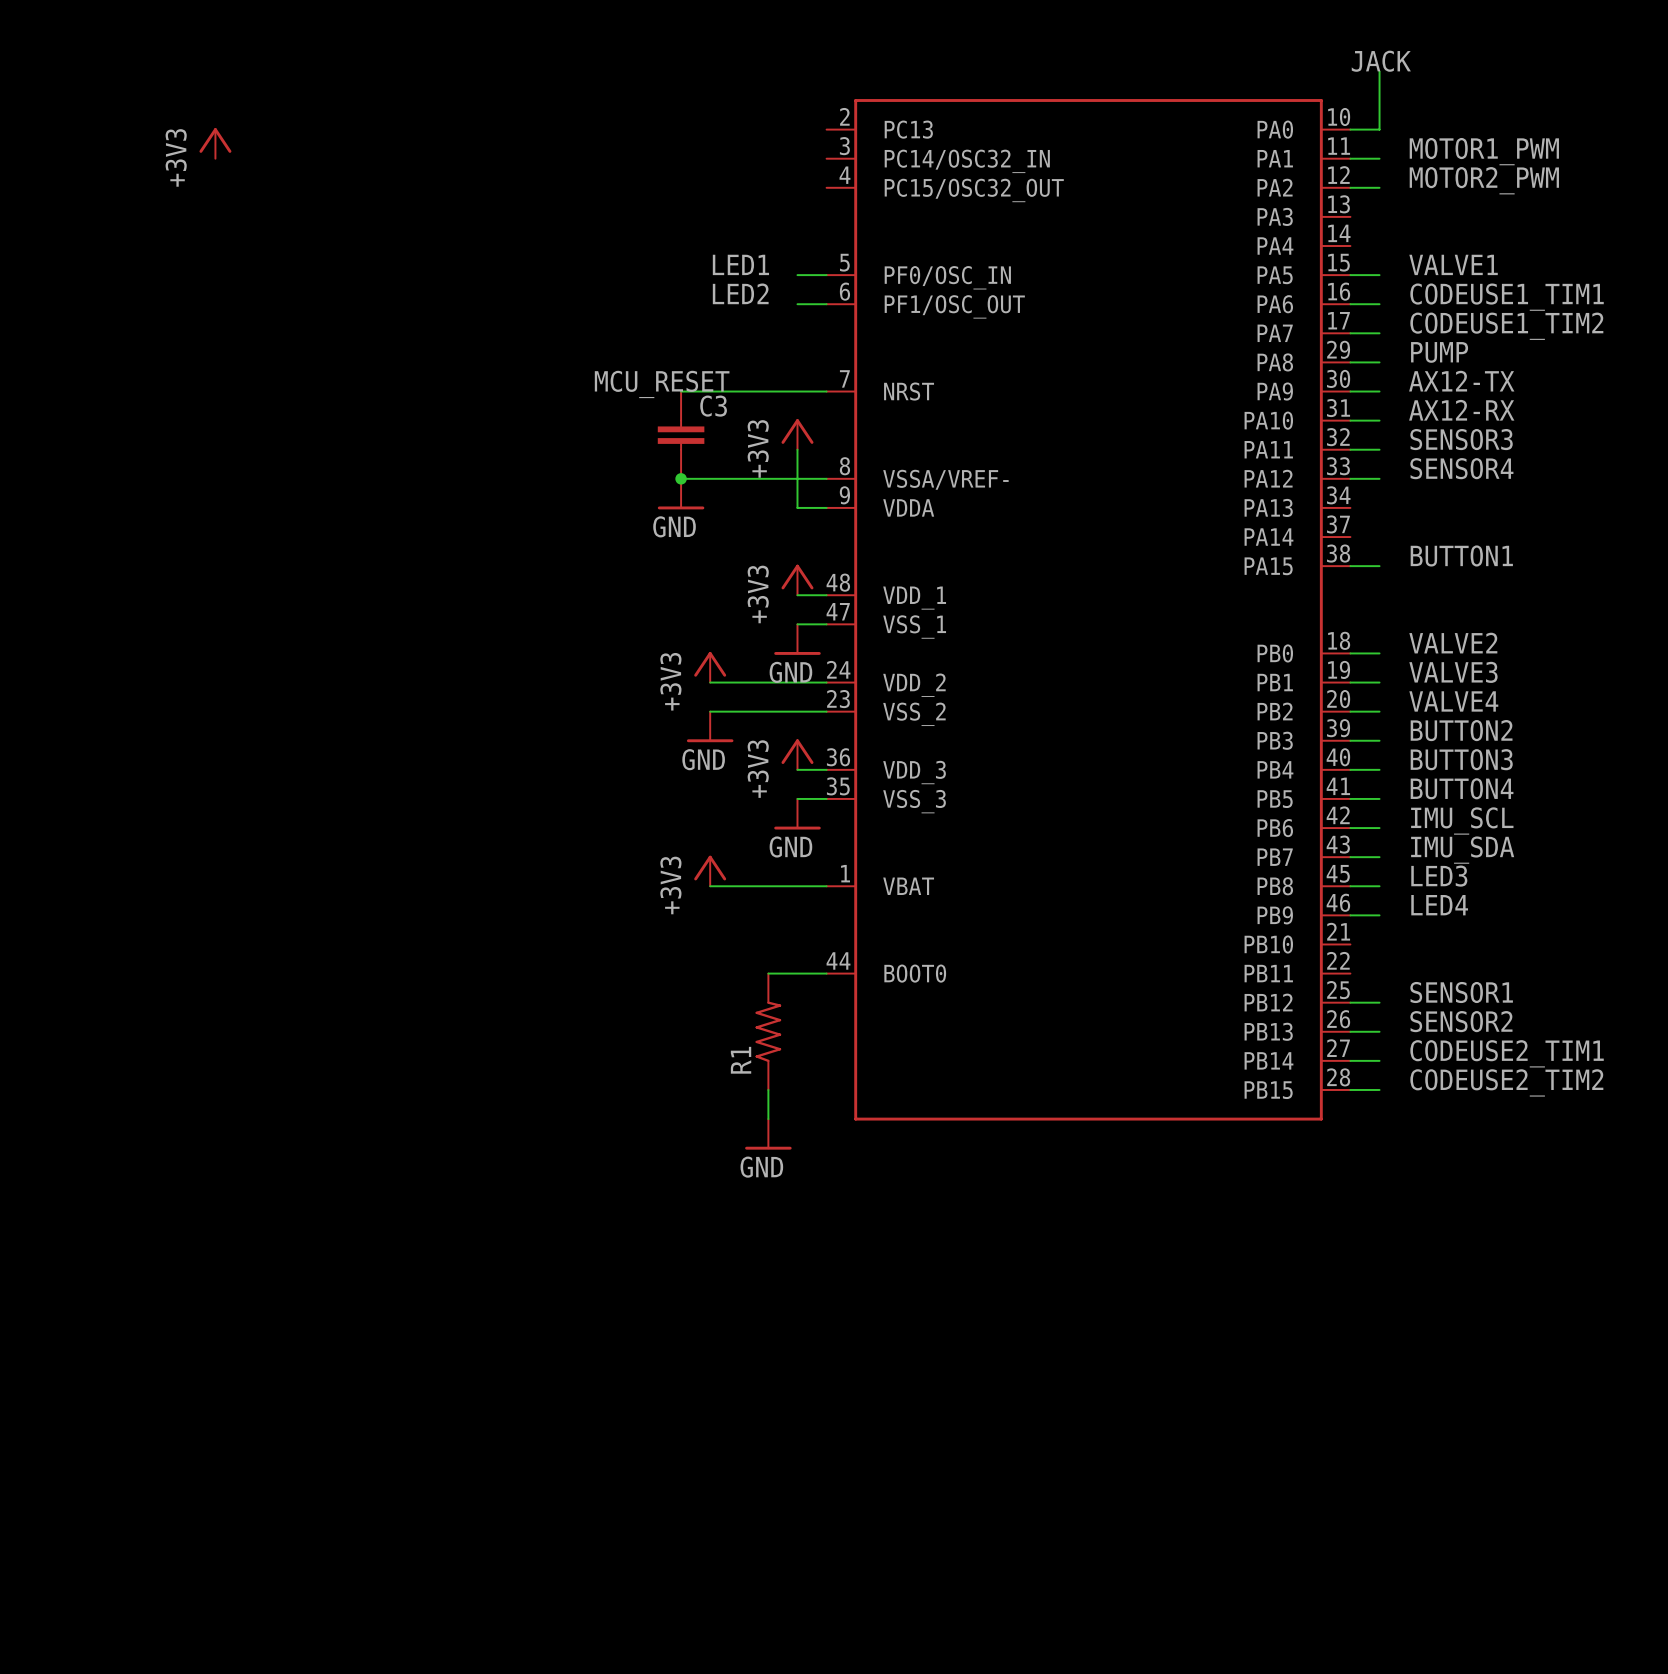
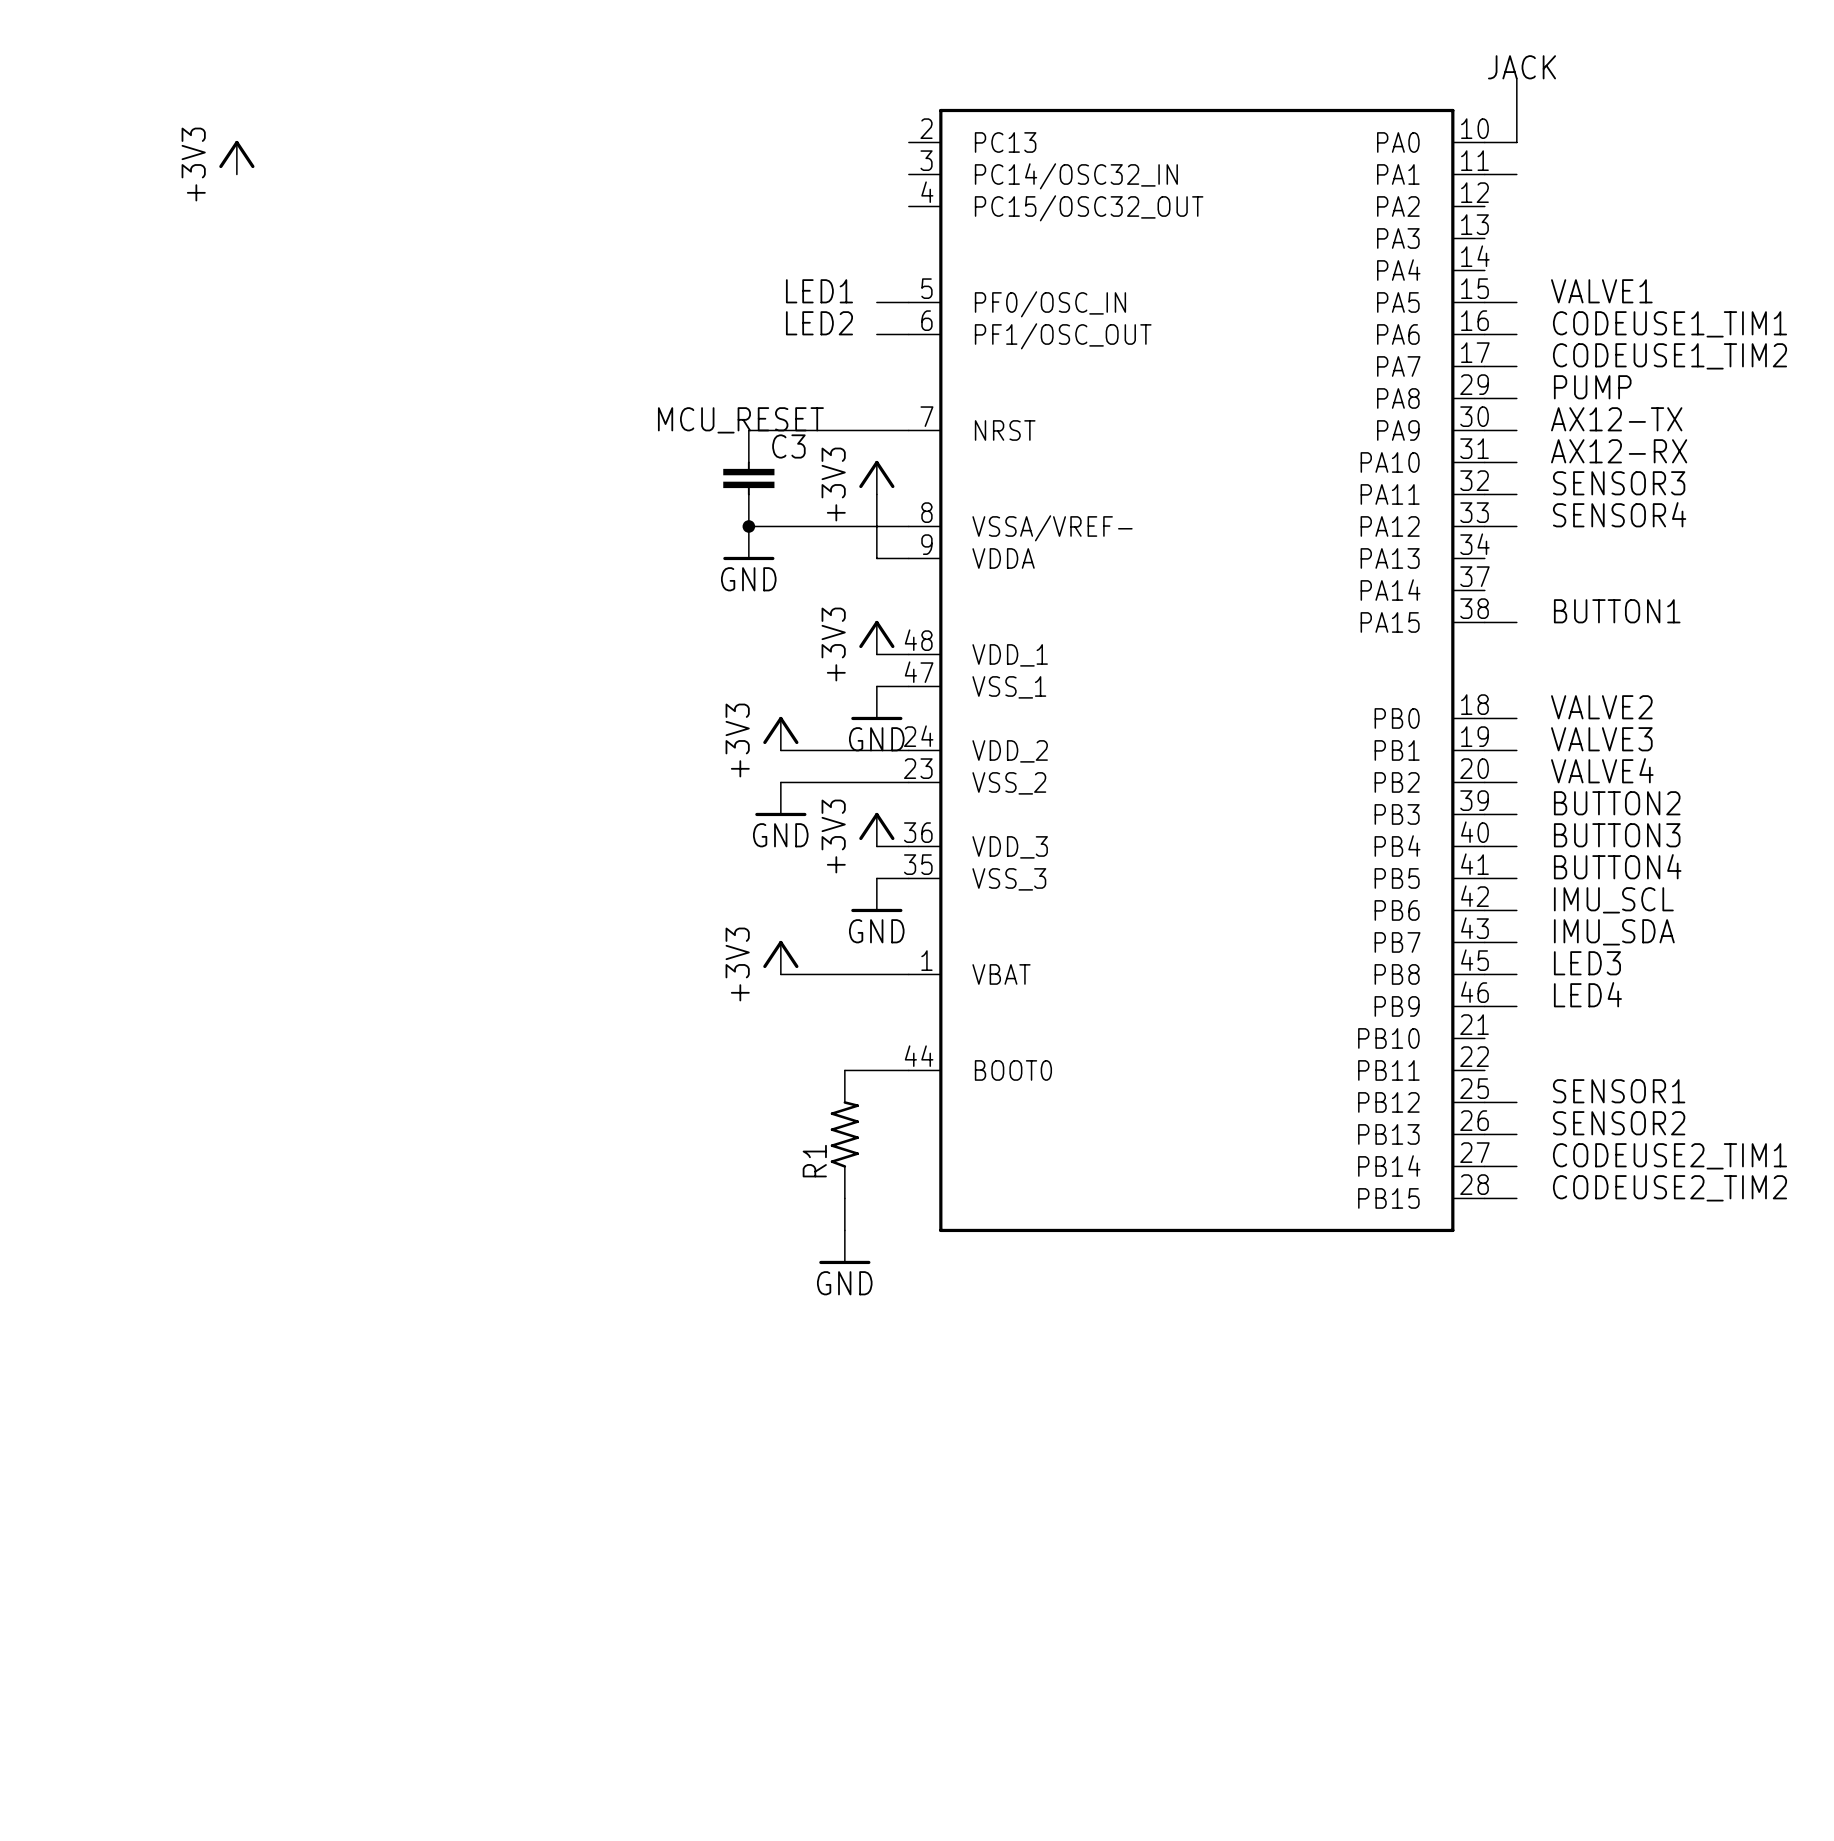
label: MOTOR1_PWM (1484, 151) -> none
label: MOTOR2_PWM (1484, 180) -> none
wire: (1350, 187) (1379, 187) -> none

